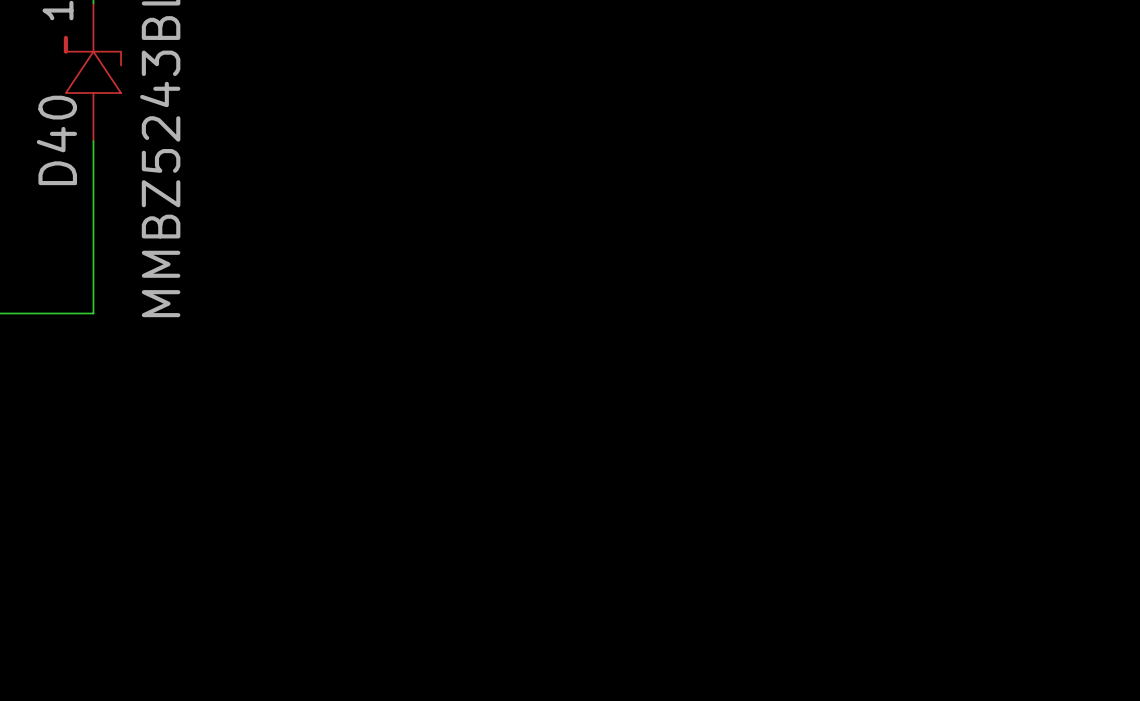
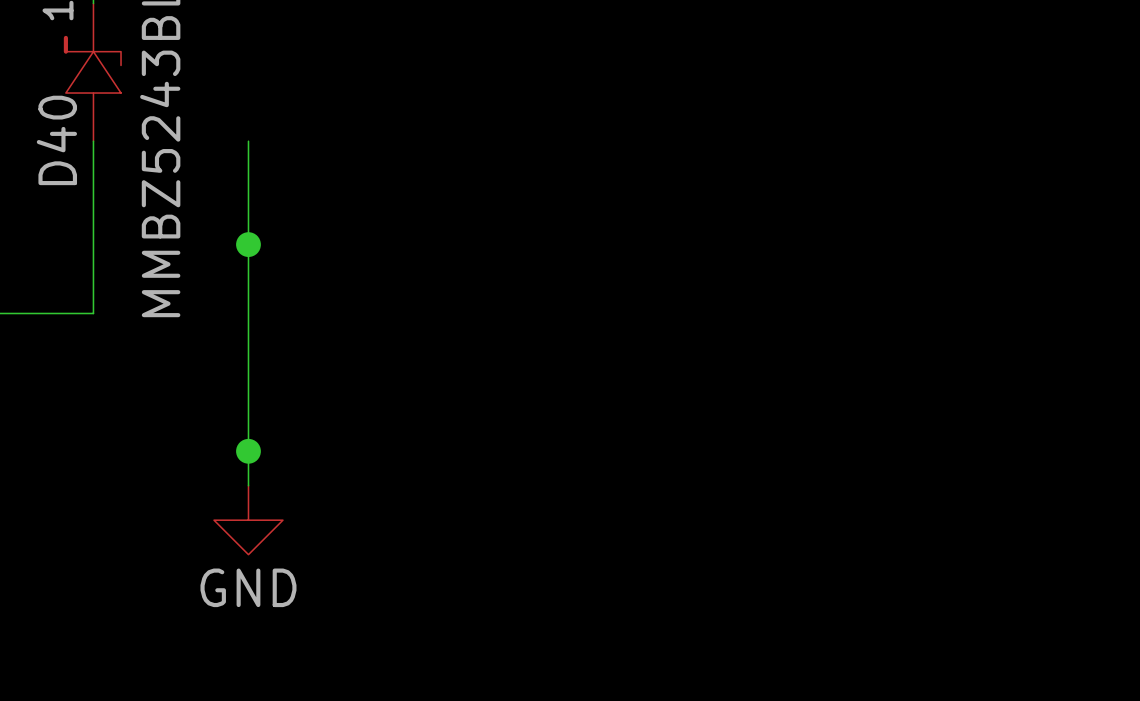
wire: none -> (248, 141) (248, 485)
junction: none -> (248, 244)
junction: none -> (248, 451)
power symbol: none -> GND (248, 520)

